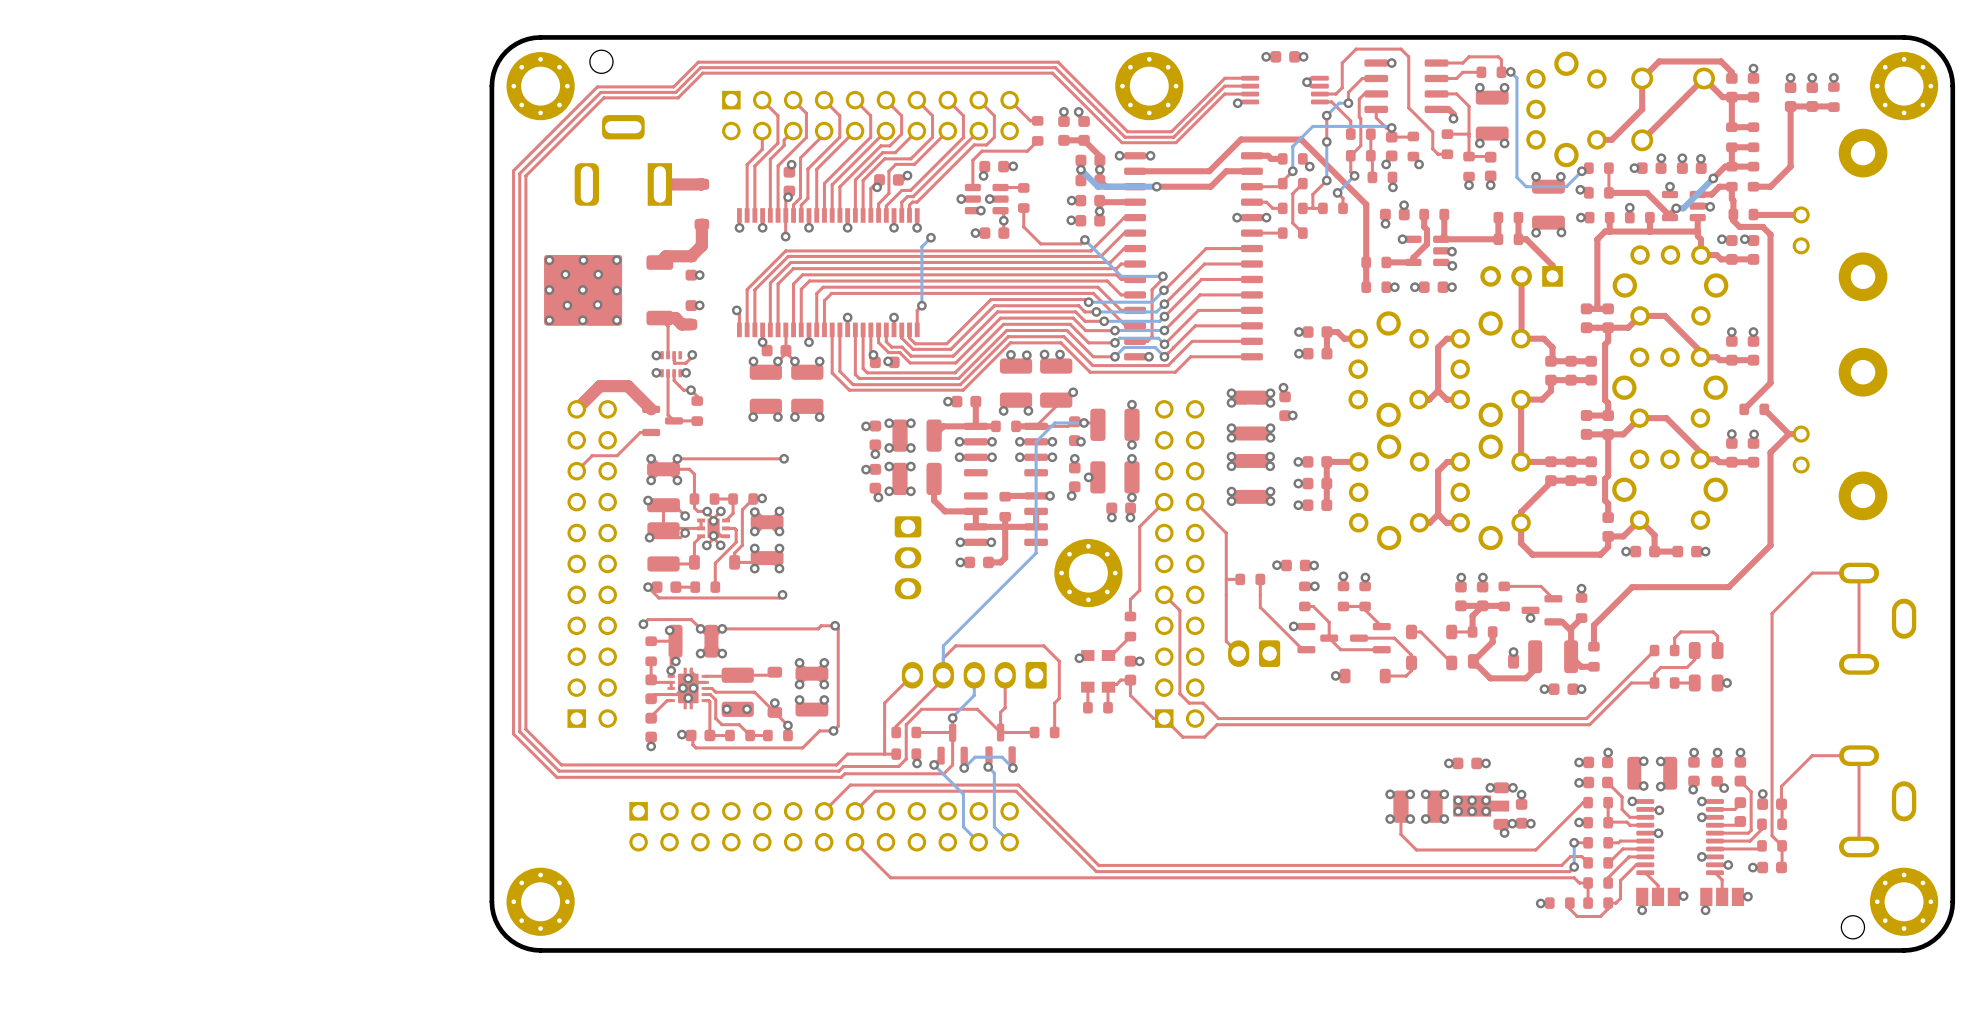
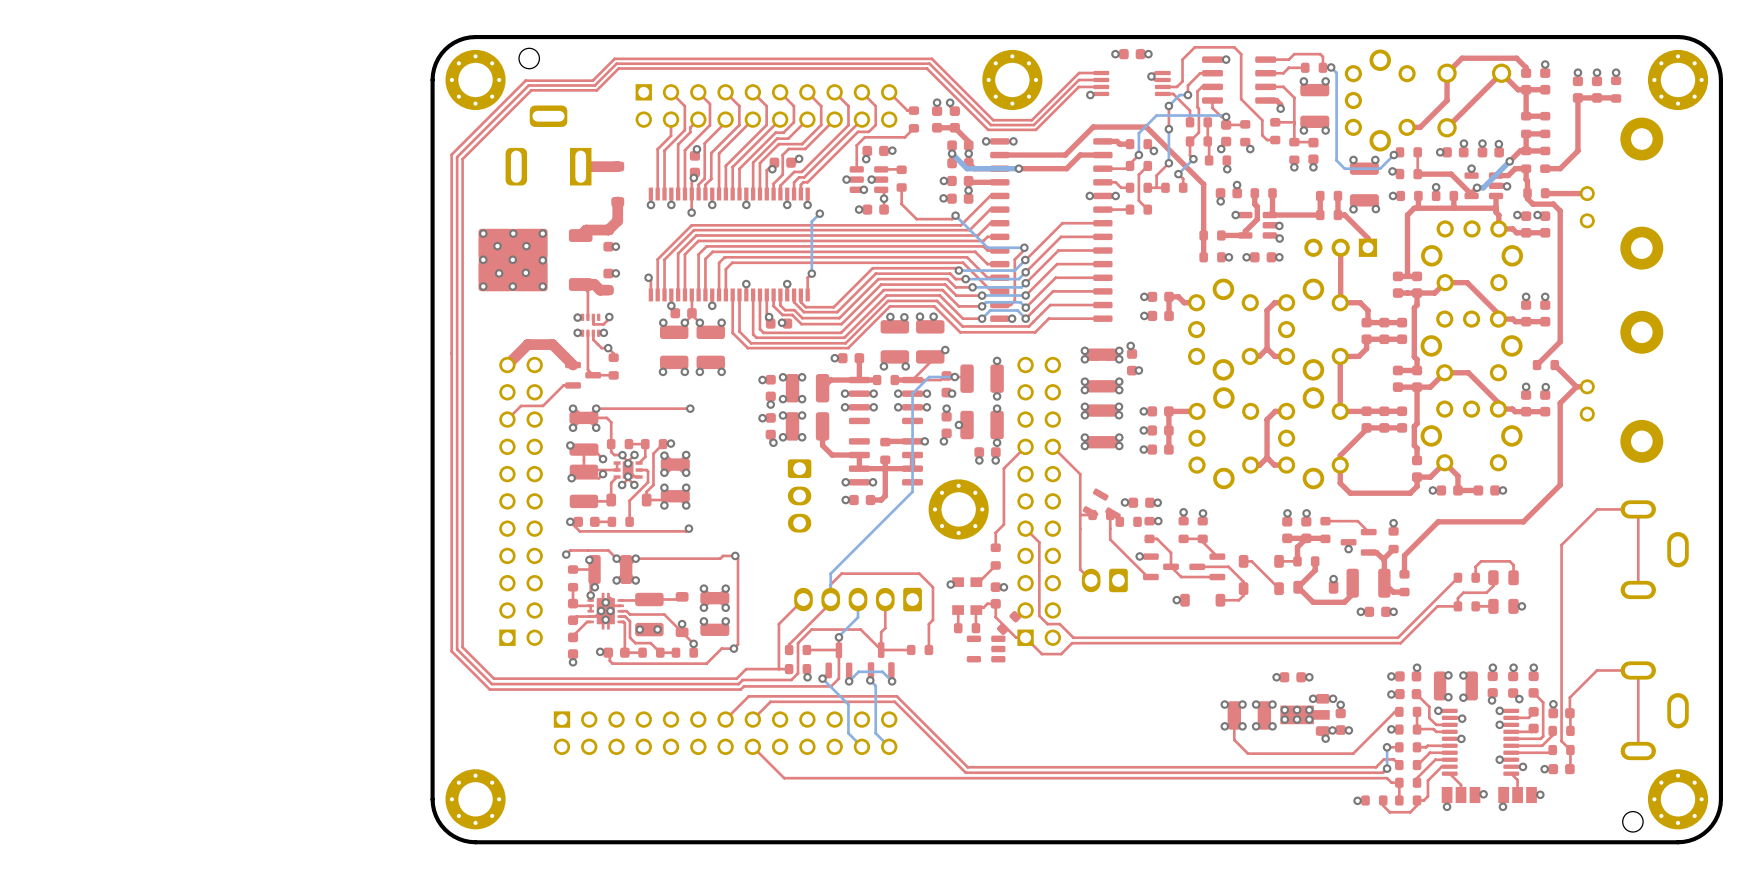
part: none -> (1101, 504)
part: none -> (1128, 521)
part: none -> (1008, 622)
part: none -> (986, 649)

